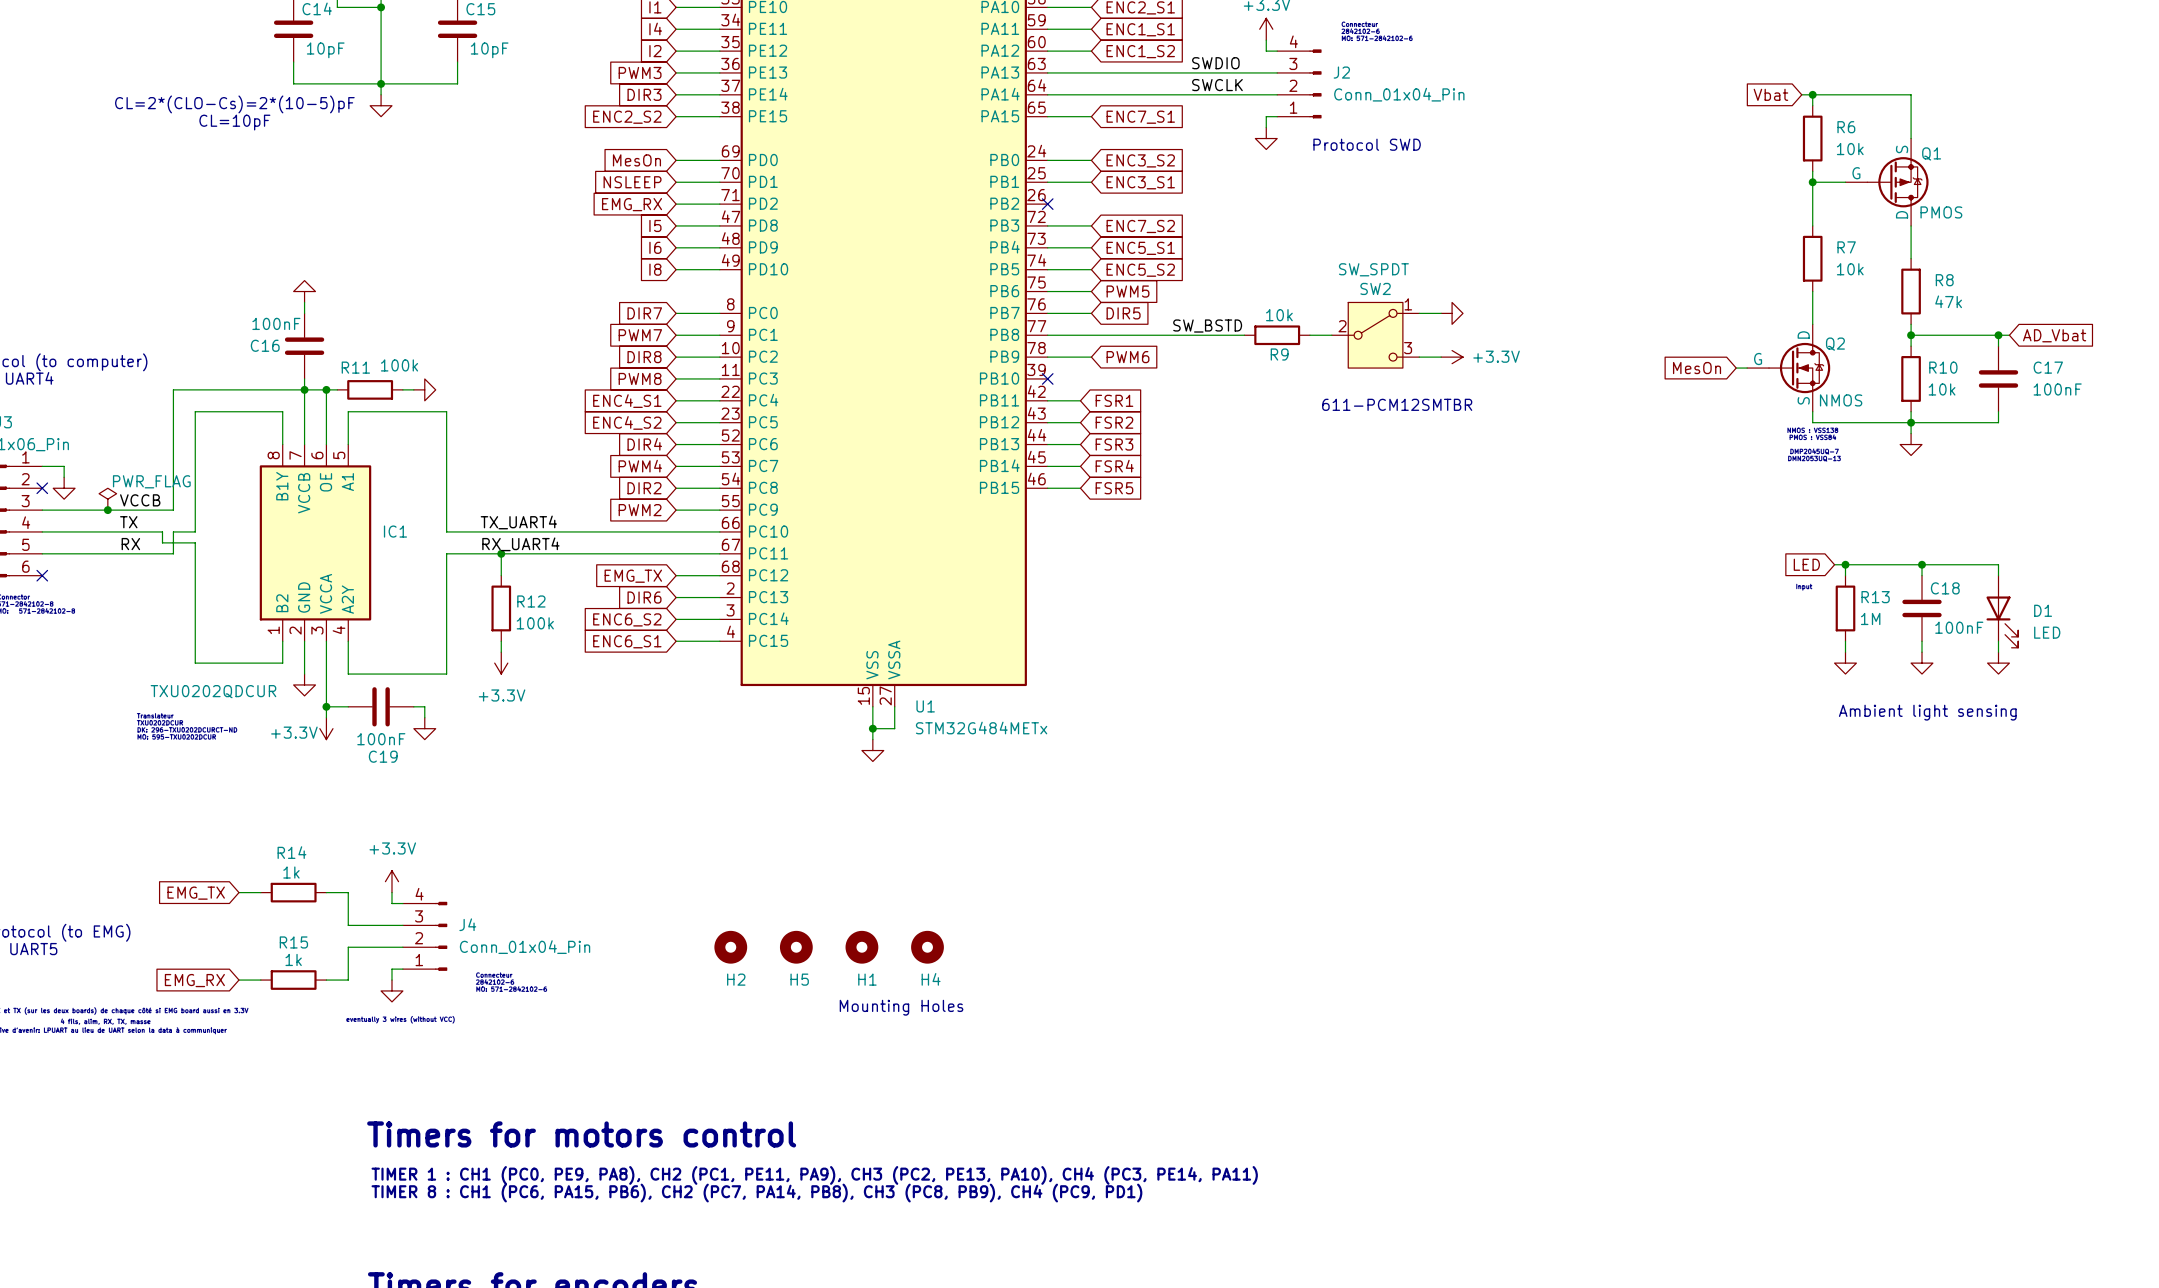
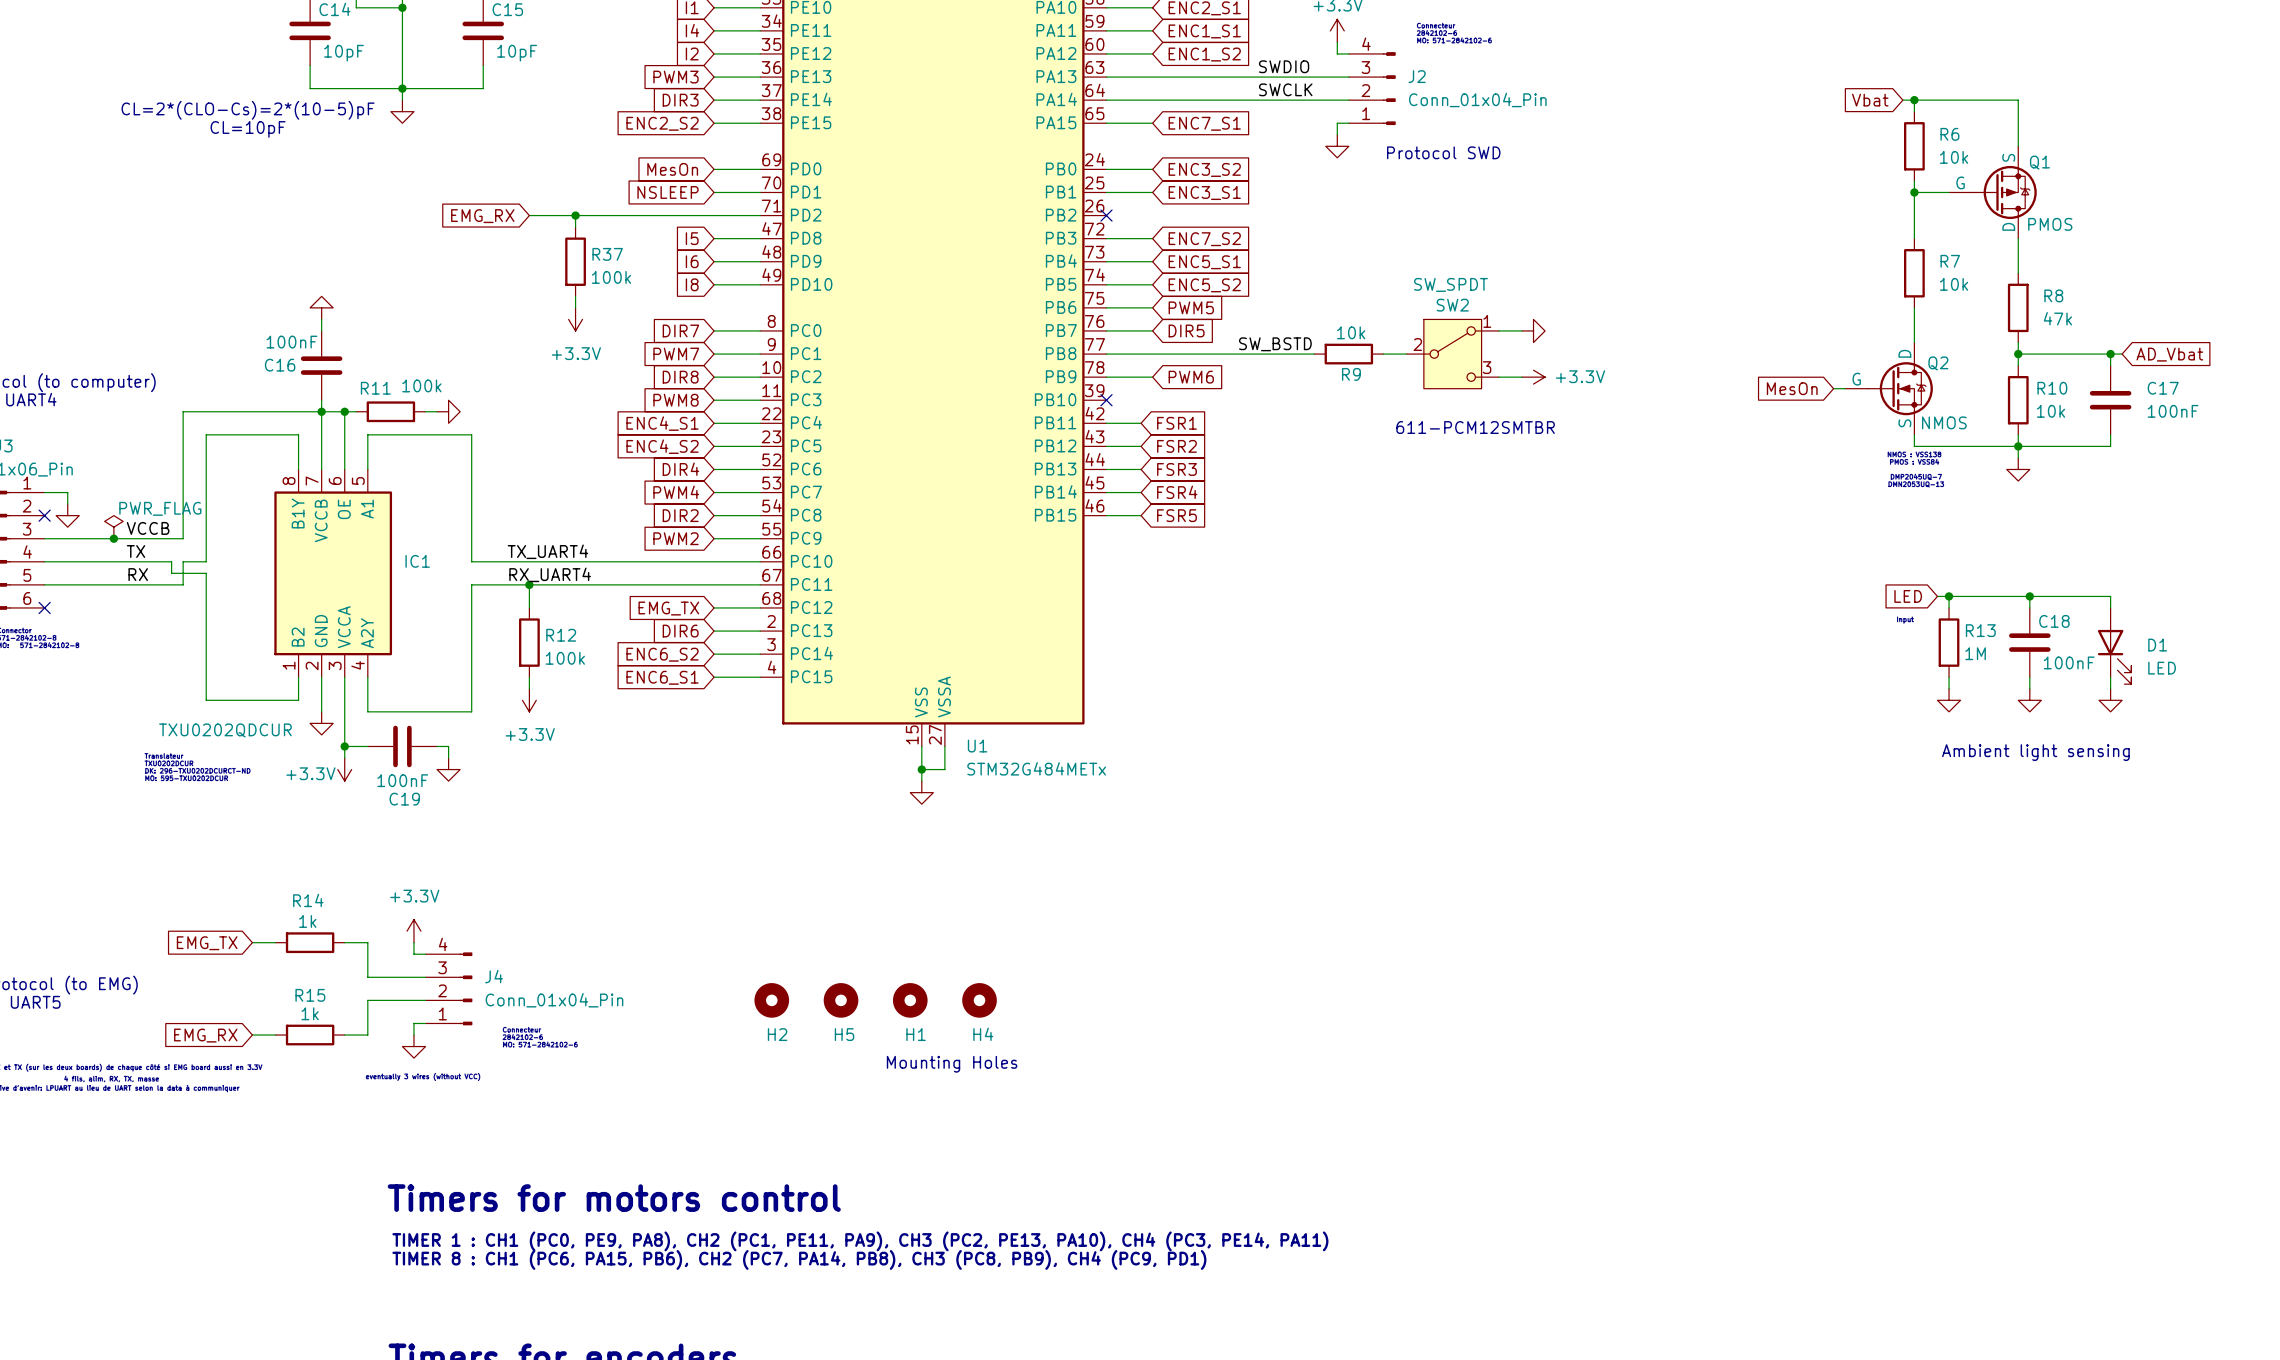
wire: none -> (529, 215) (714, 215)
wire: none -> (575, 215) (575, 227)
junction: none -> (575, 215)
global label position: EMG_RX (632, 204) -> EMG_RX (482, 216)
R37: none -> 100k (575, 261)
wire: none -> (575, 296) (575, 307)
power symbol: none -> +3.3V (575, 319)

